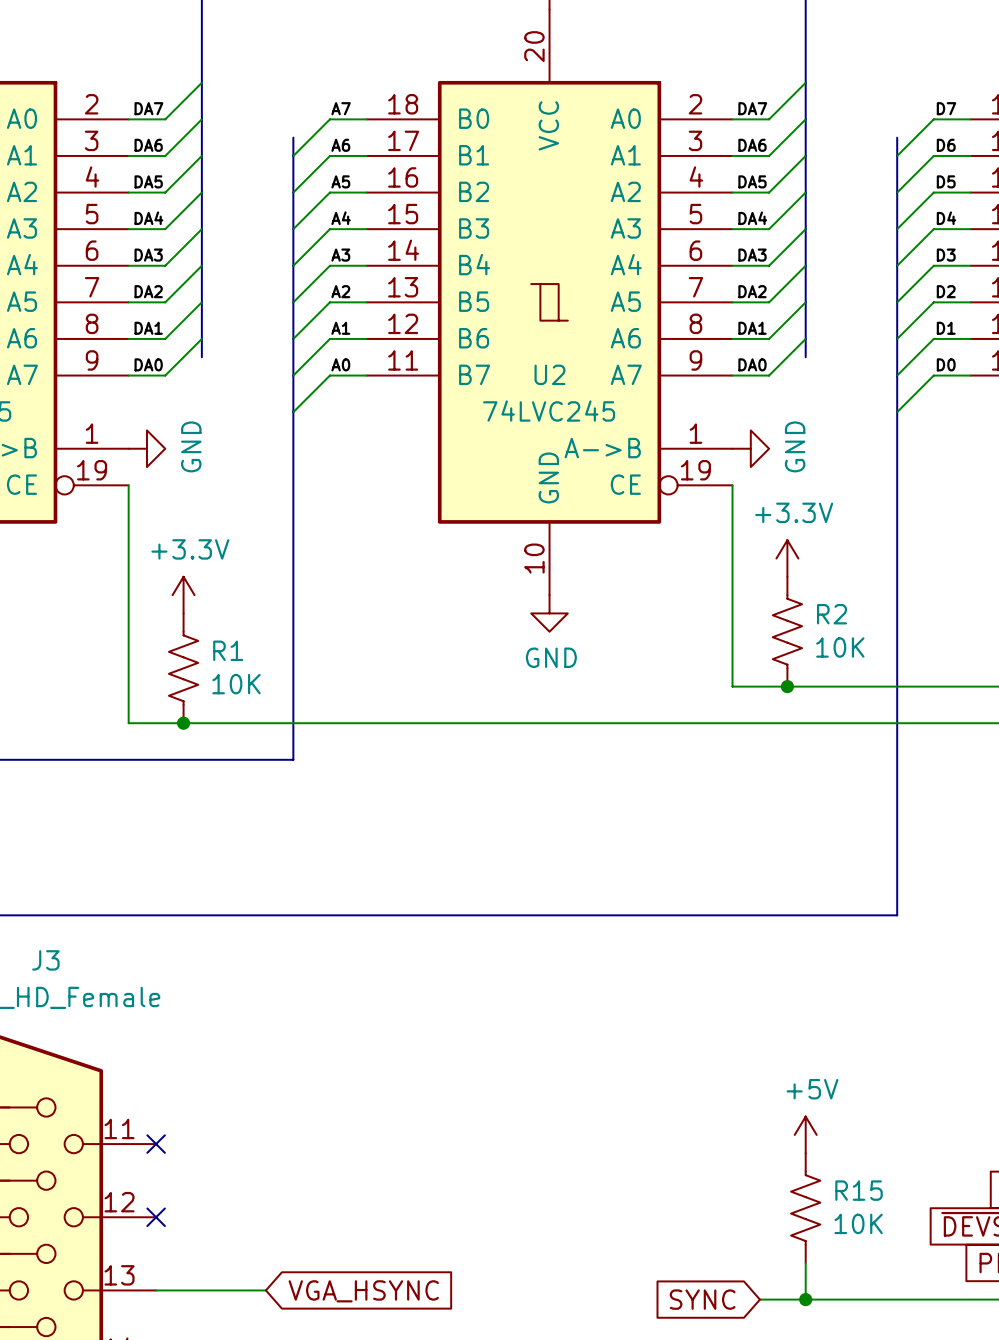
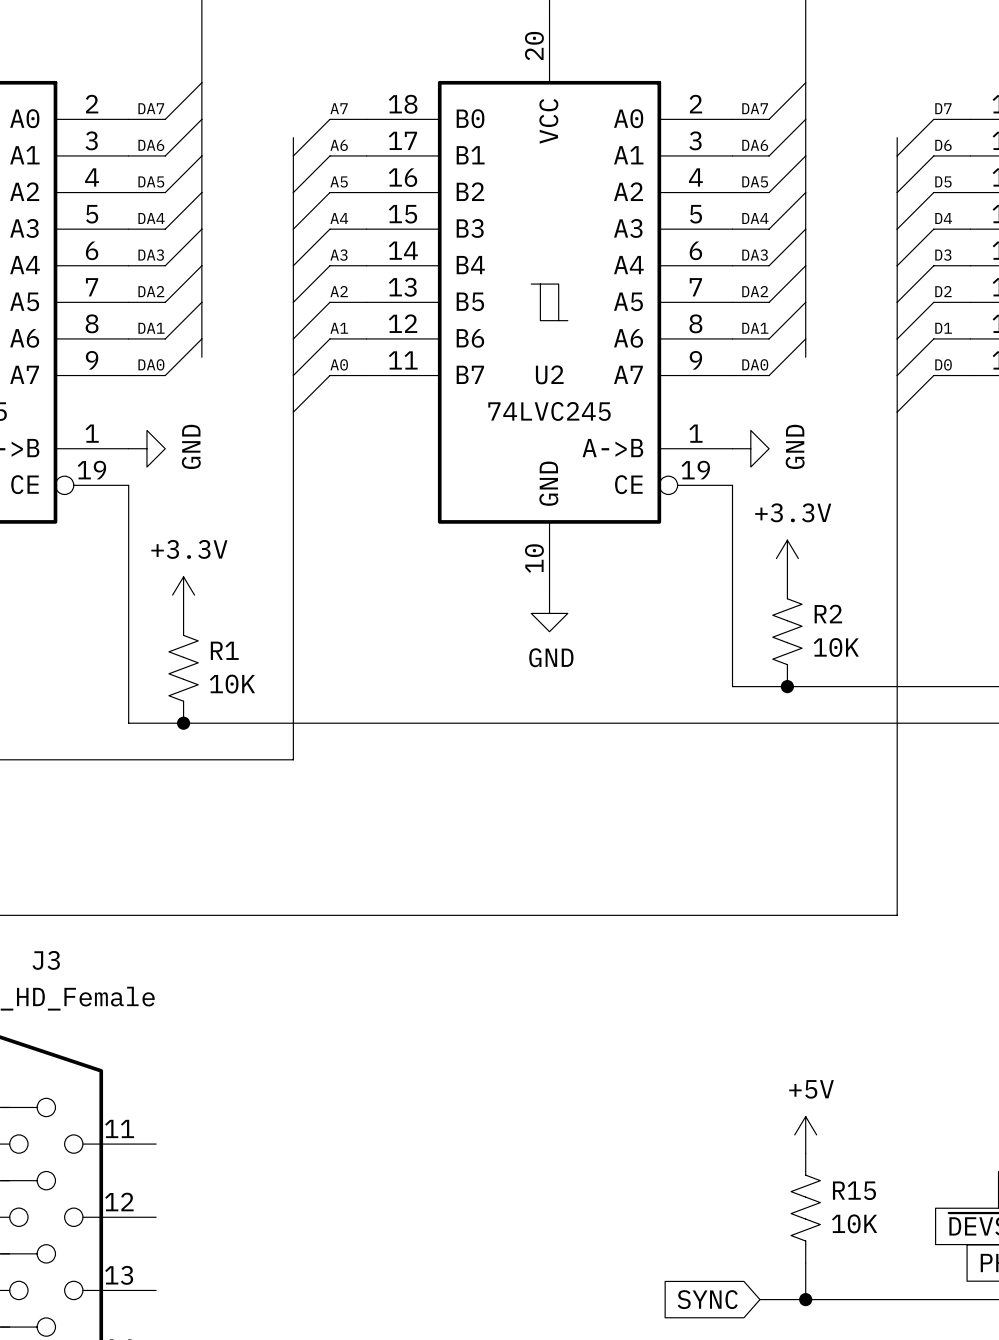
no-connect mark: (156, 1144) -> none
no-connect mark: (156, 1217) -> none
wire: (156, 1290) (265, 1290) -> none
global label: VGA_HSYNC (363, 1291) -> none

